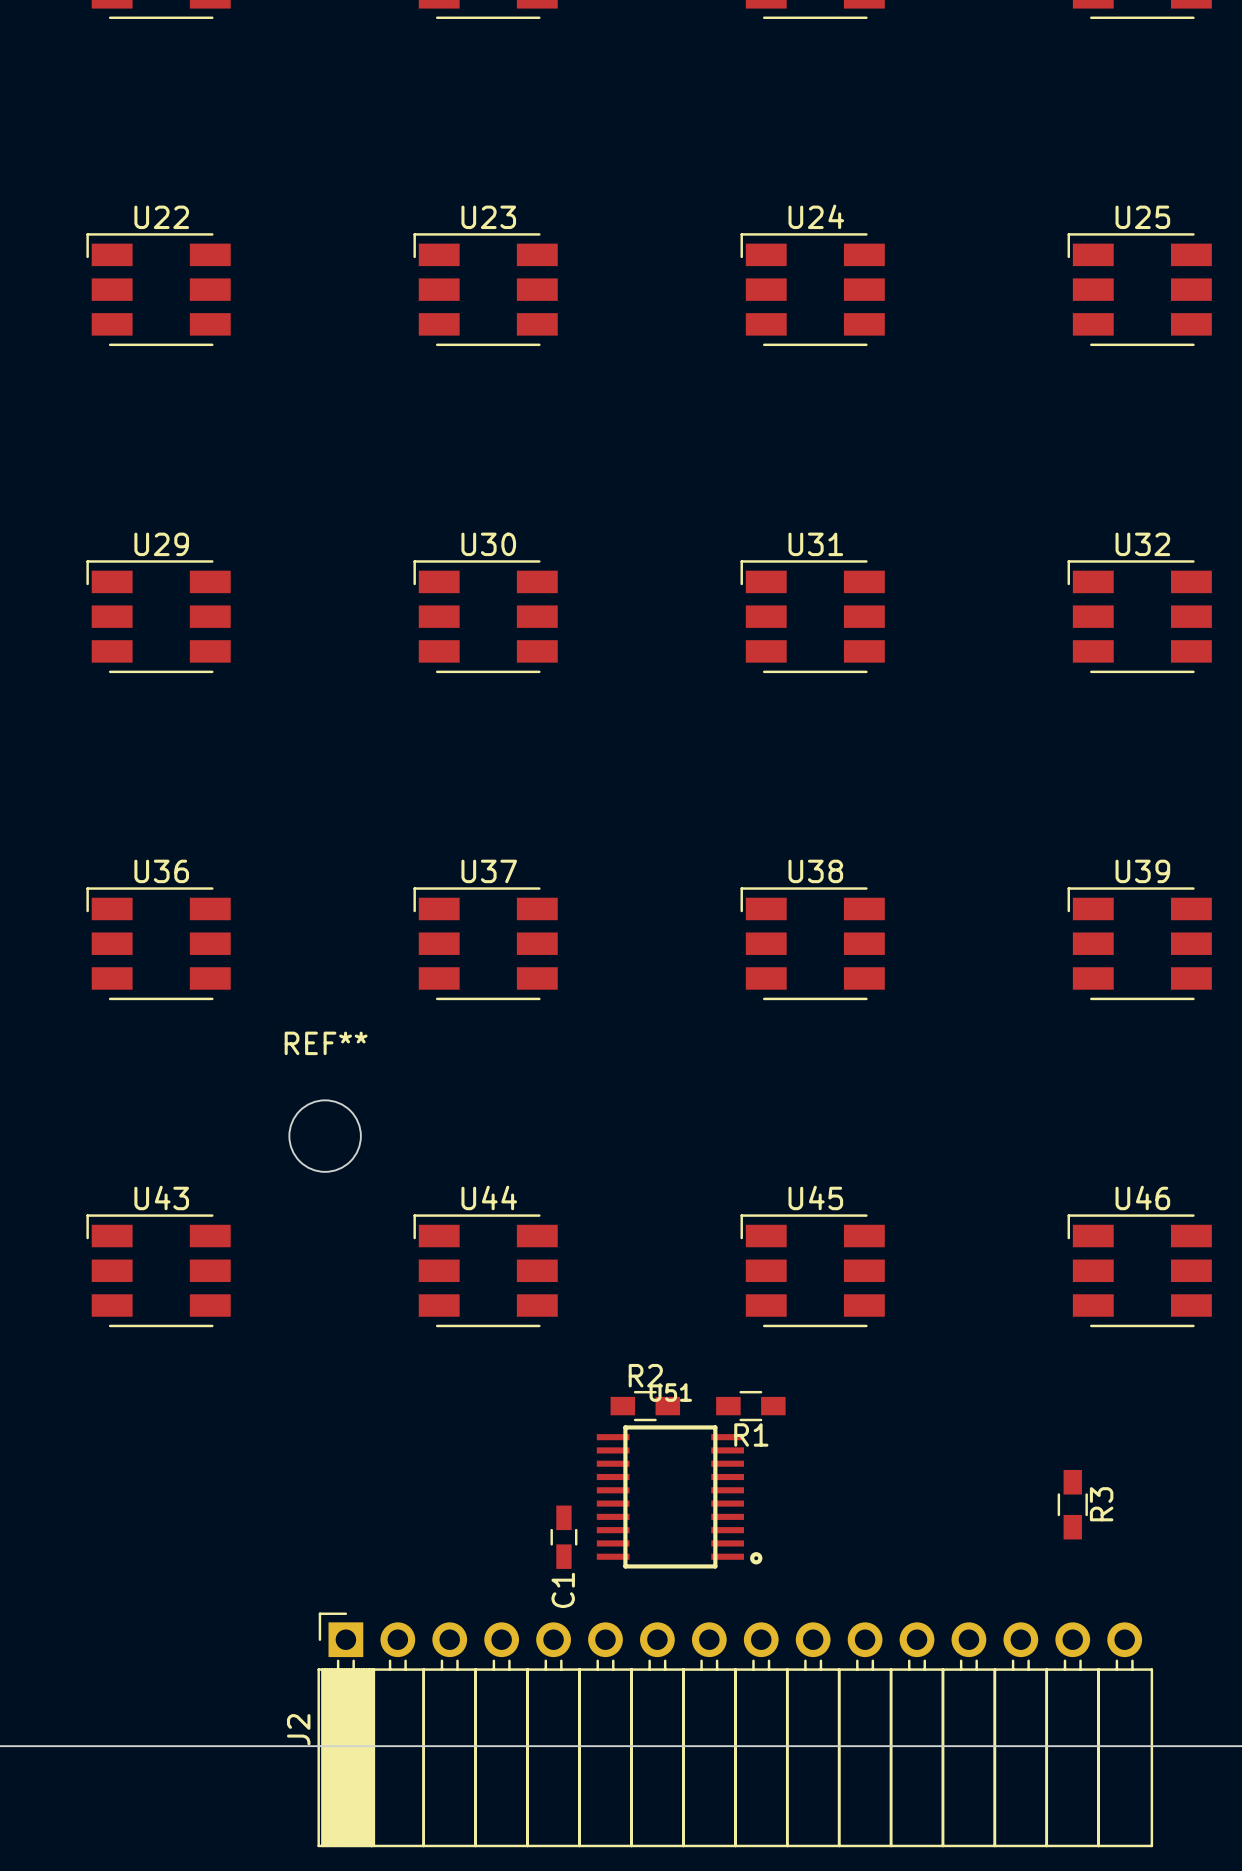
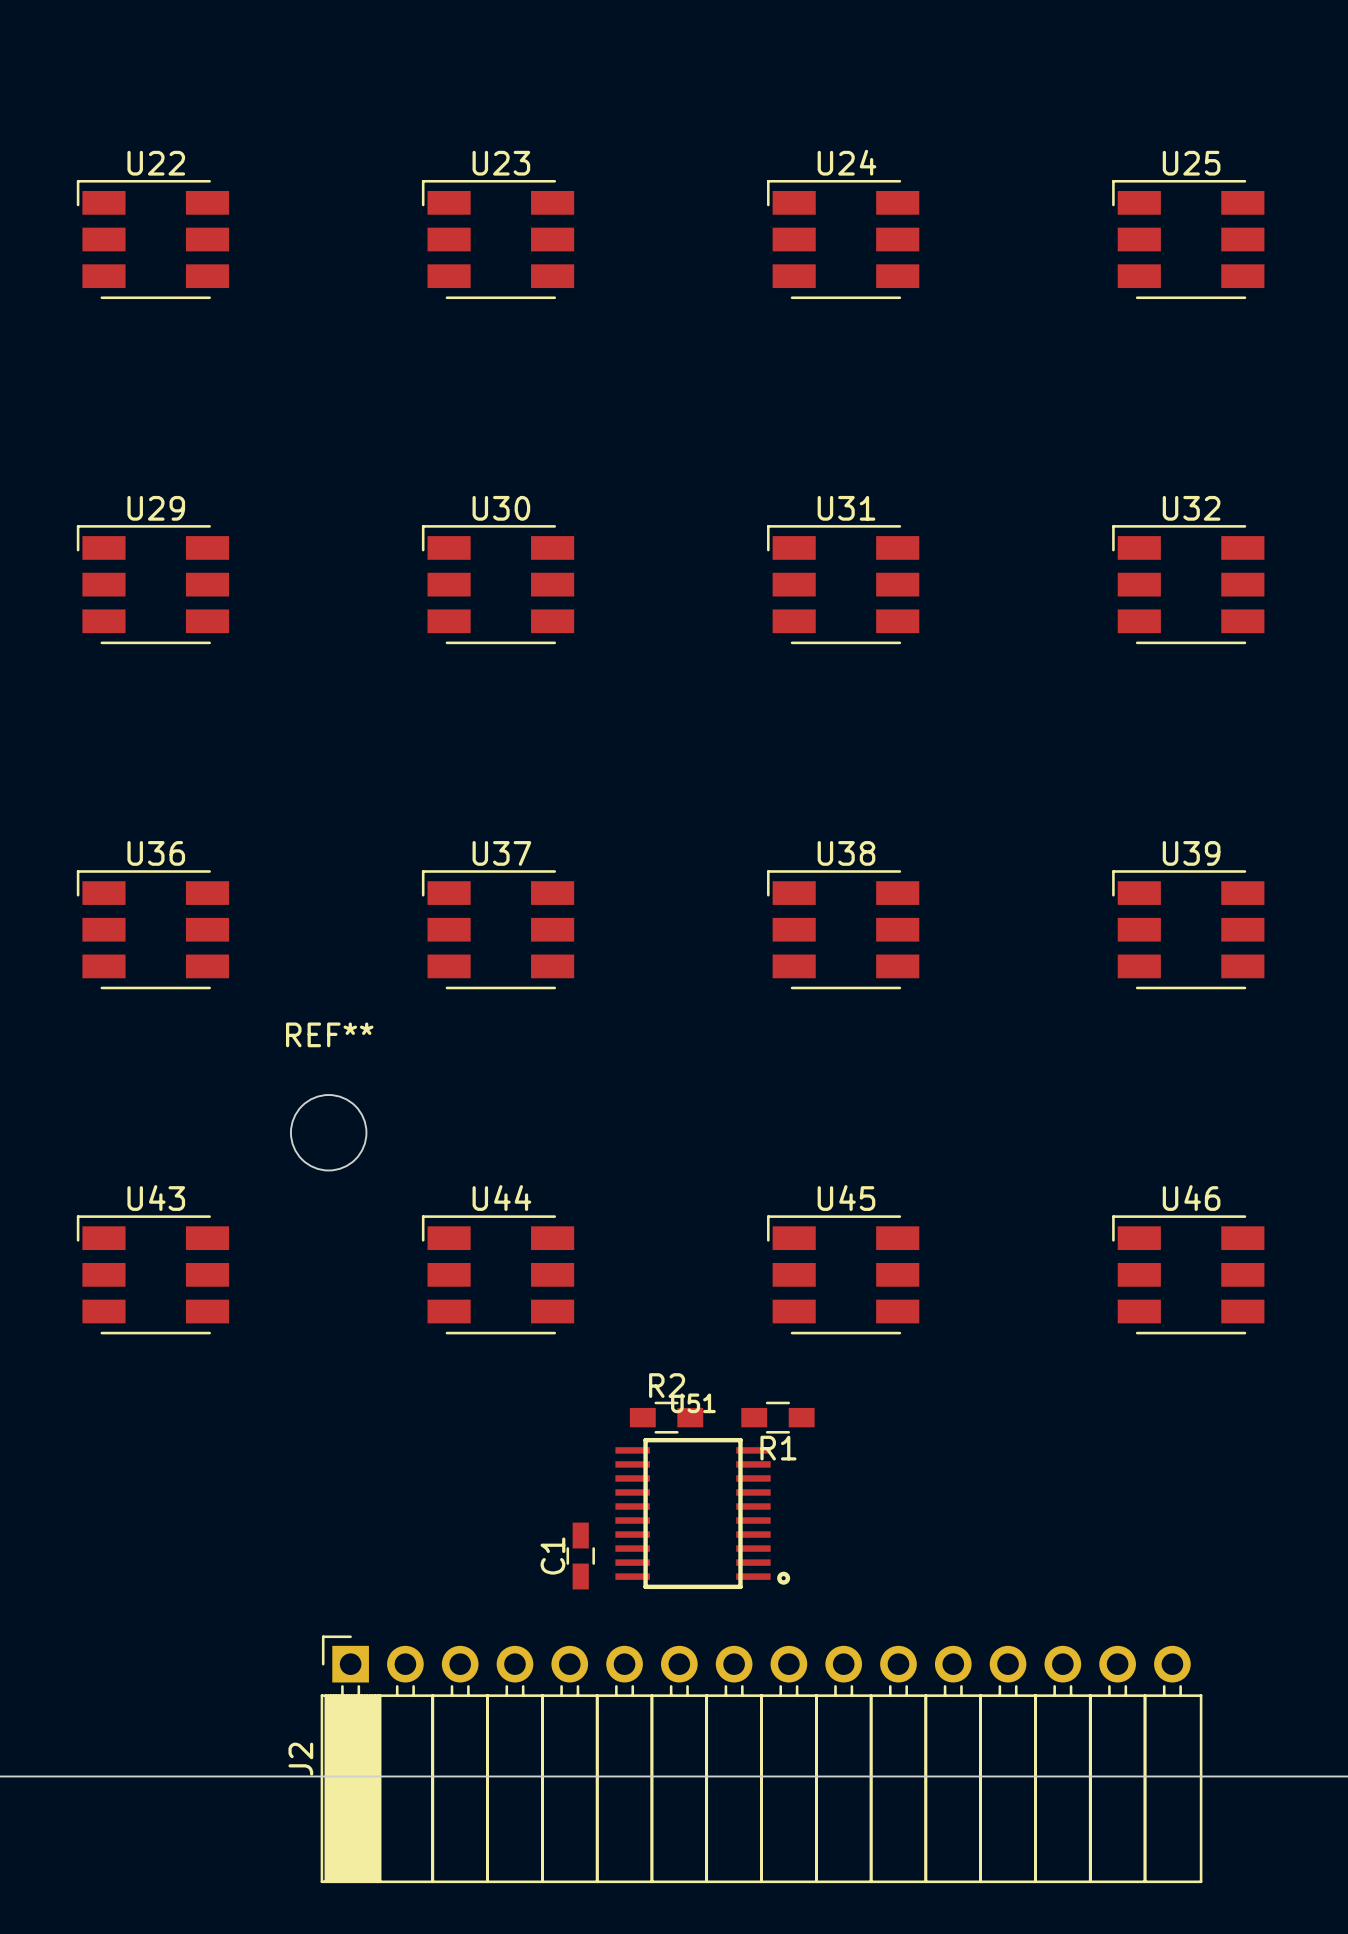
R3: (1072, 1504) -> none
C1 name position: C1 (563, 1590) -> C1 (552, 1556)

